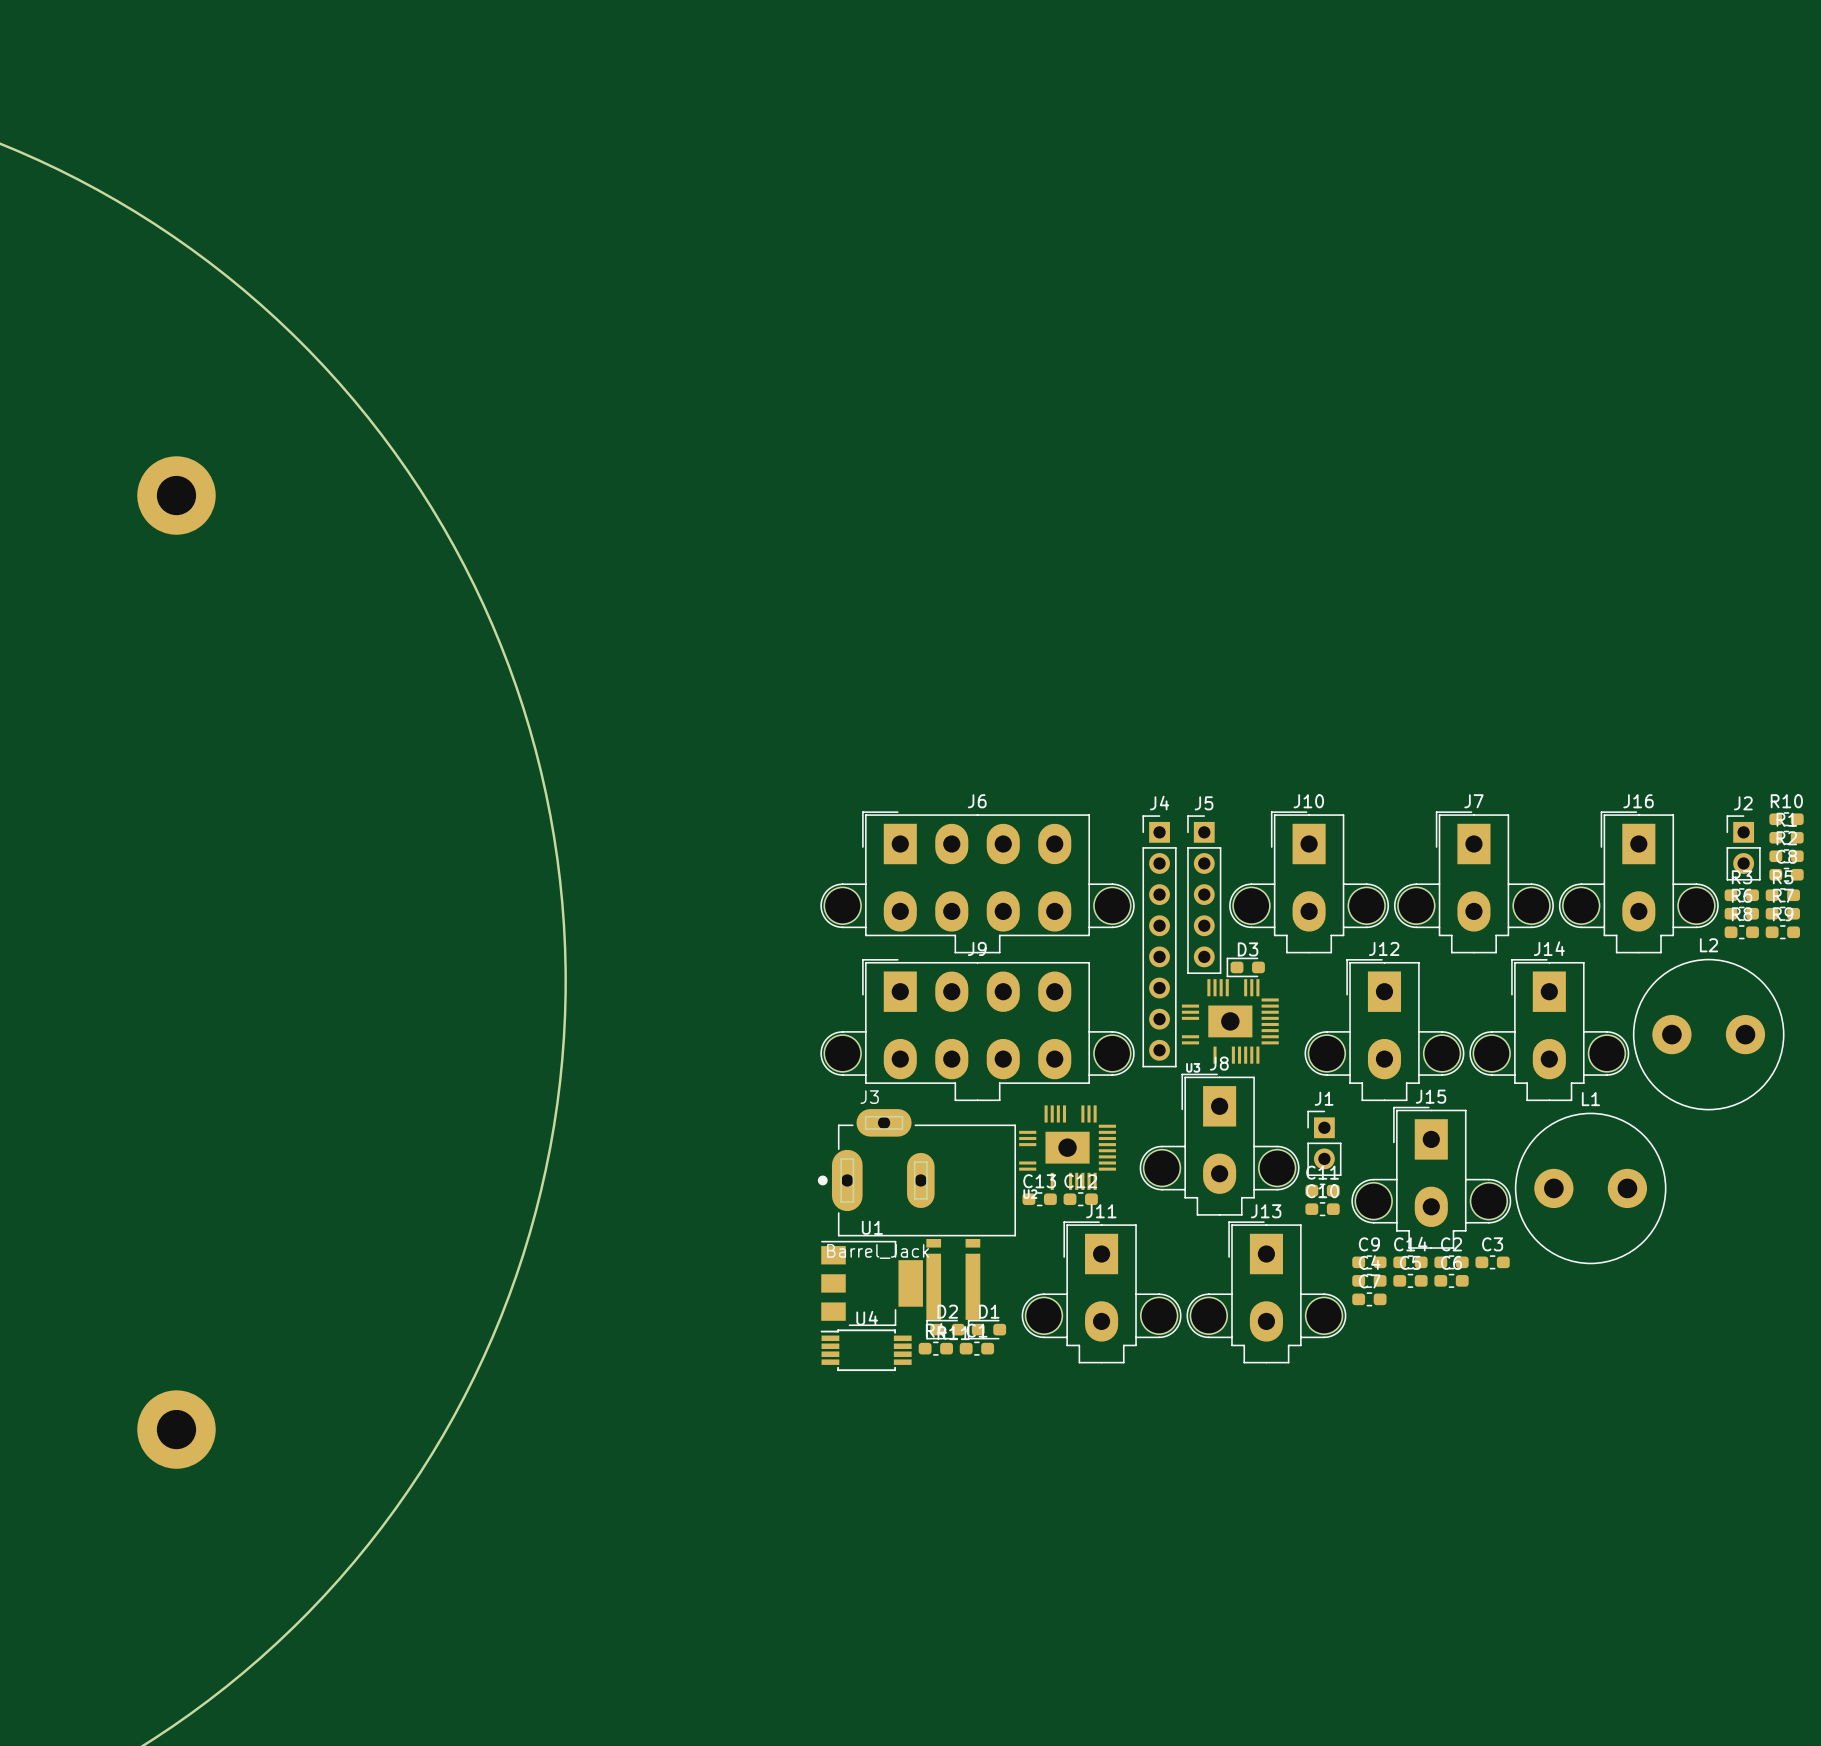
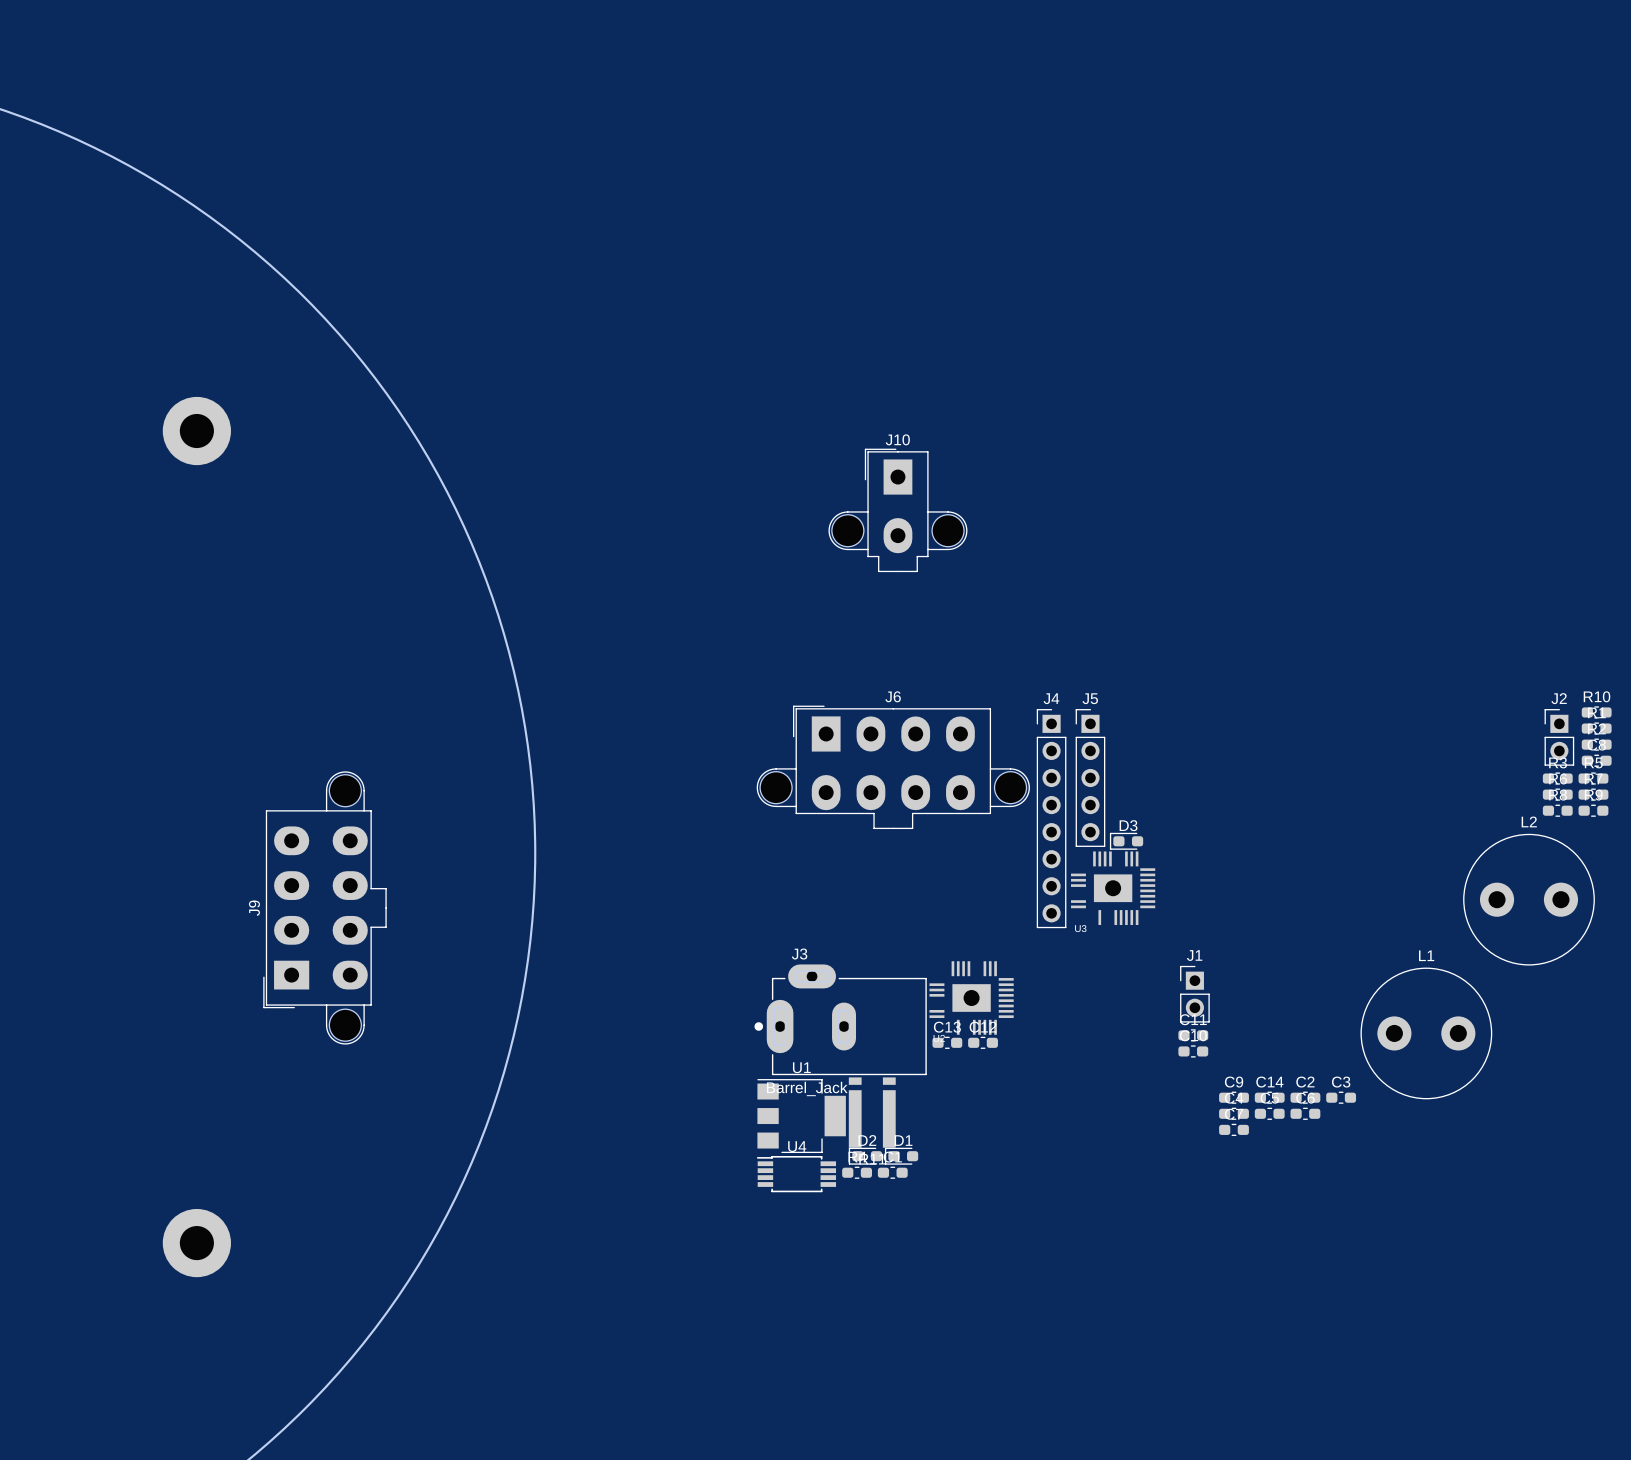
J10 position: (1309, 882) -> (897, 510)
J7: (1473, 882) -> none
J16: (1638, 882) -> none
J9 rotation: 0° (977, 1030) -> 90° counterclockwise (324, 907)
J9 position: (977, 1030) -> (324, 907)
J12: (1384, 1030) -> none
J14: (1549, 1030) -> none
J8: (1219, 1144) -> none
J15: (1431, 1177) -> none
J11: (1101, 1292) -> none
J13: (1266, 1292) -> none

